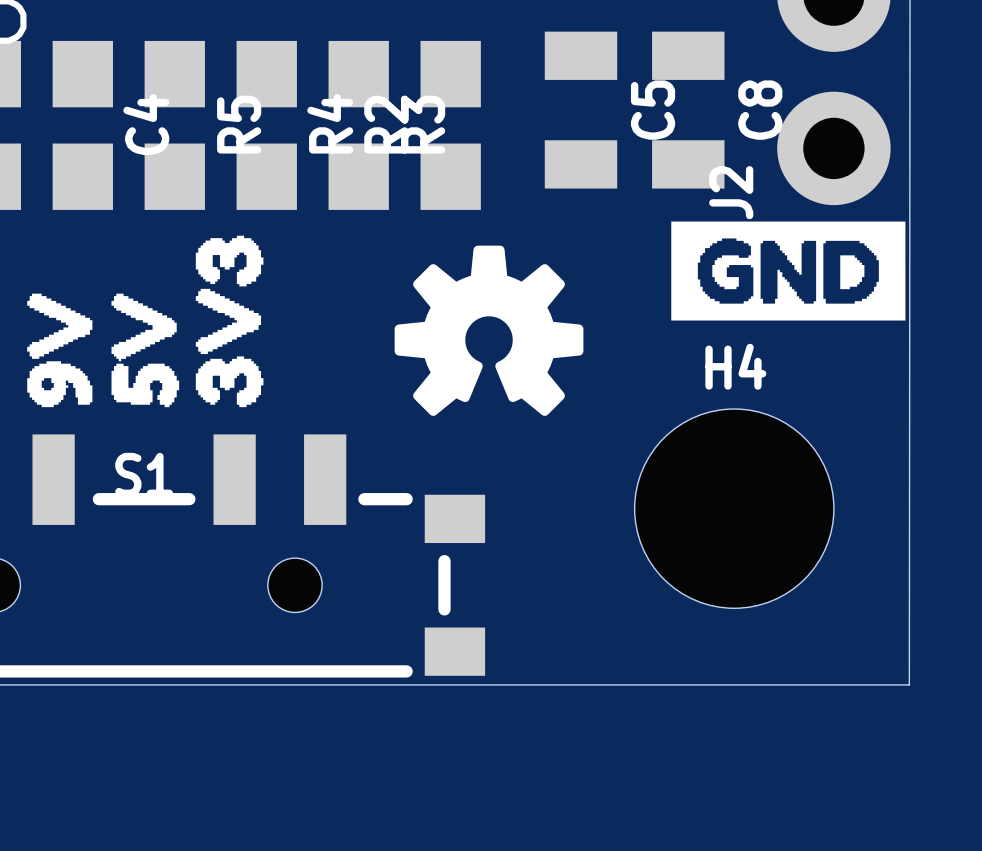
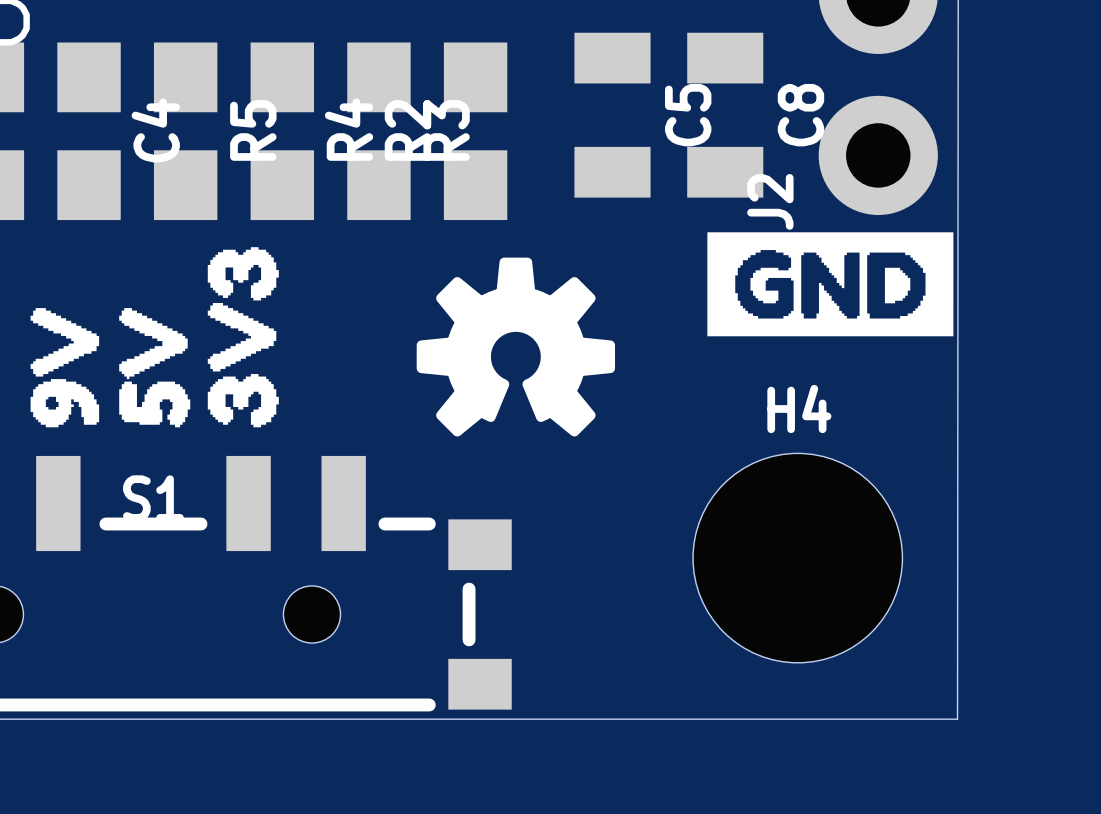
H4 position: (734, 508) -> (797, 558)

